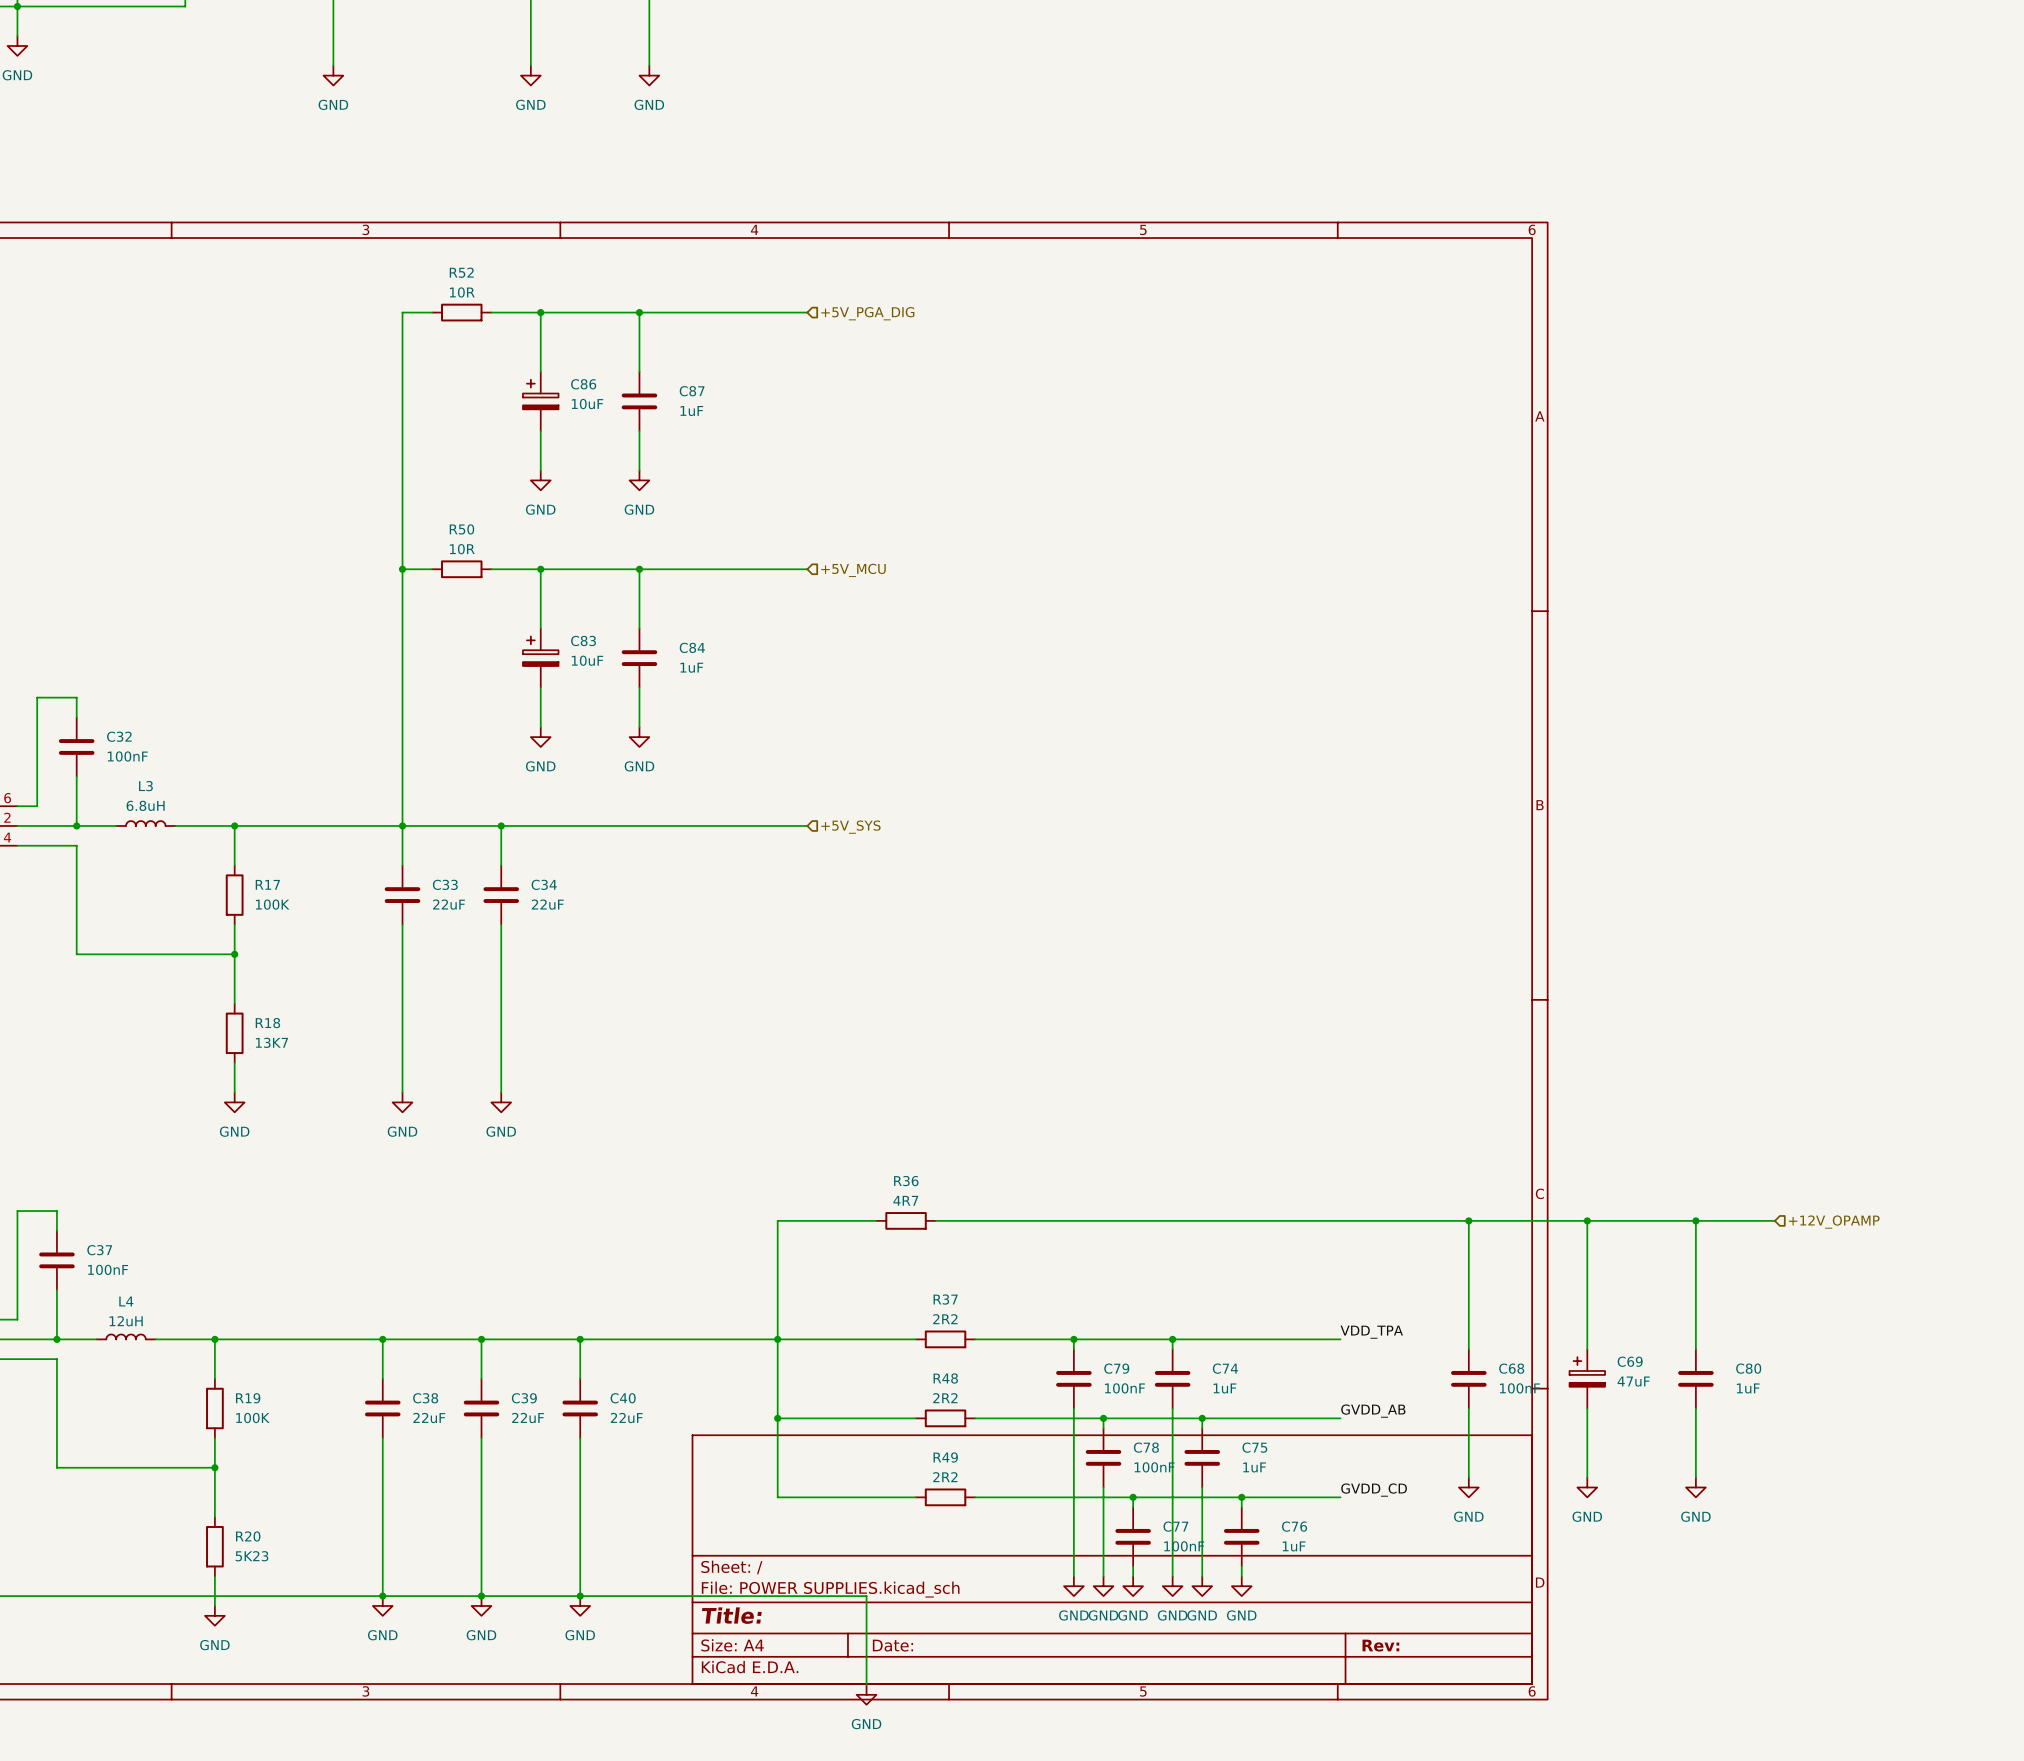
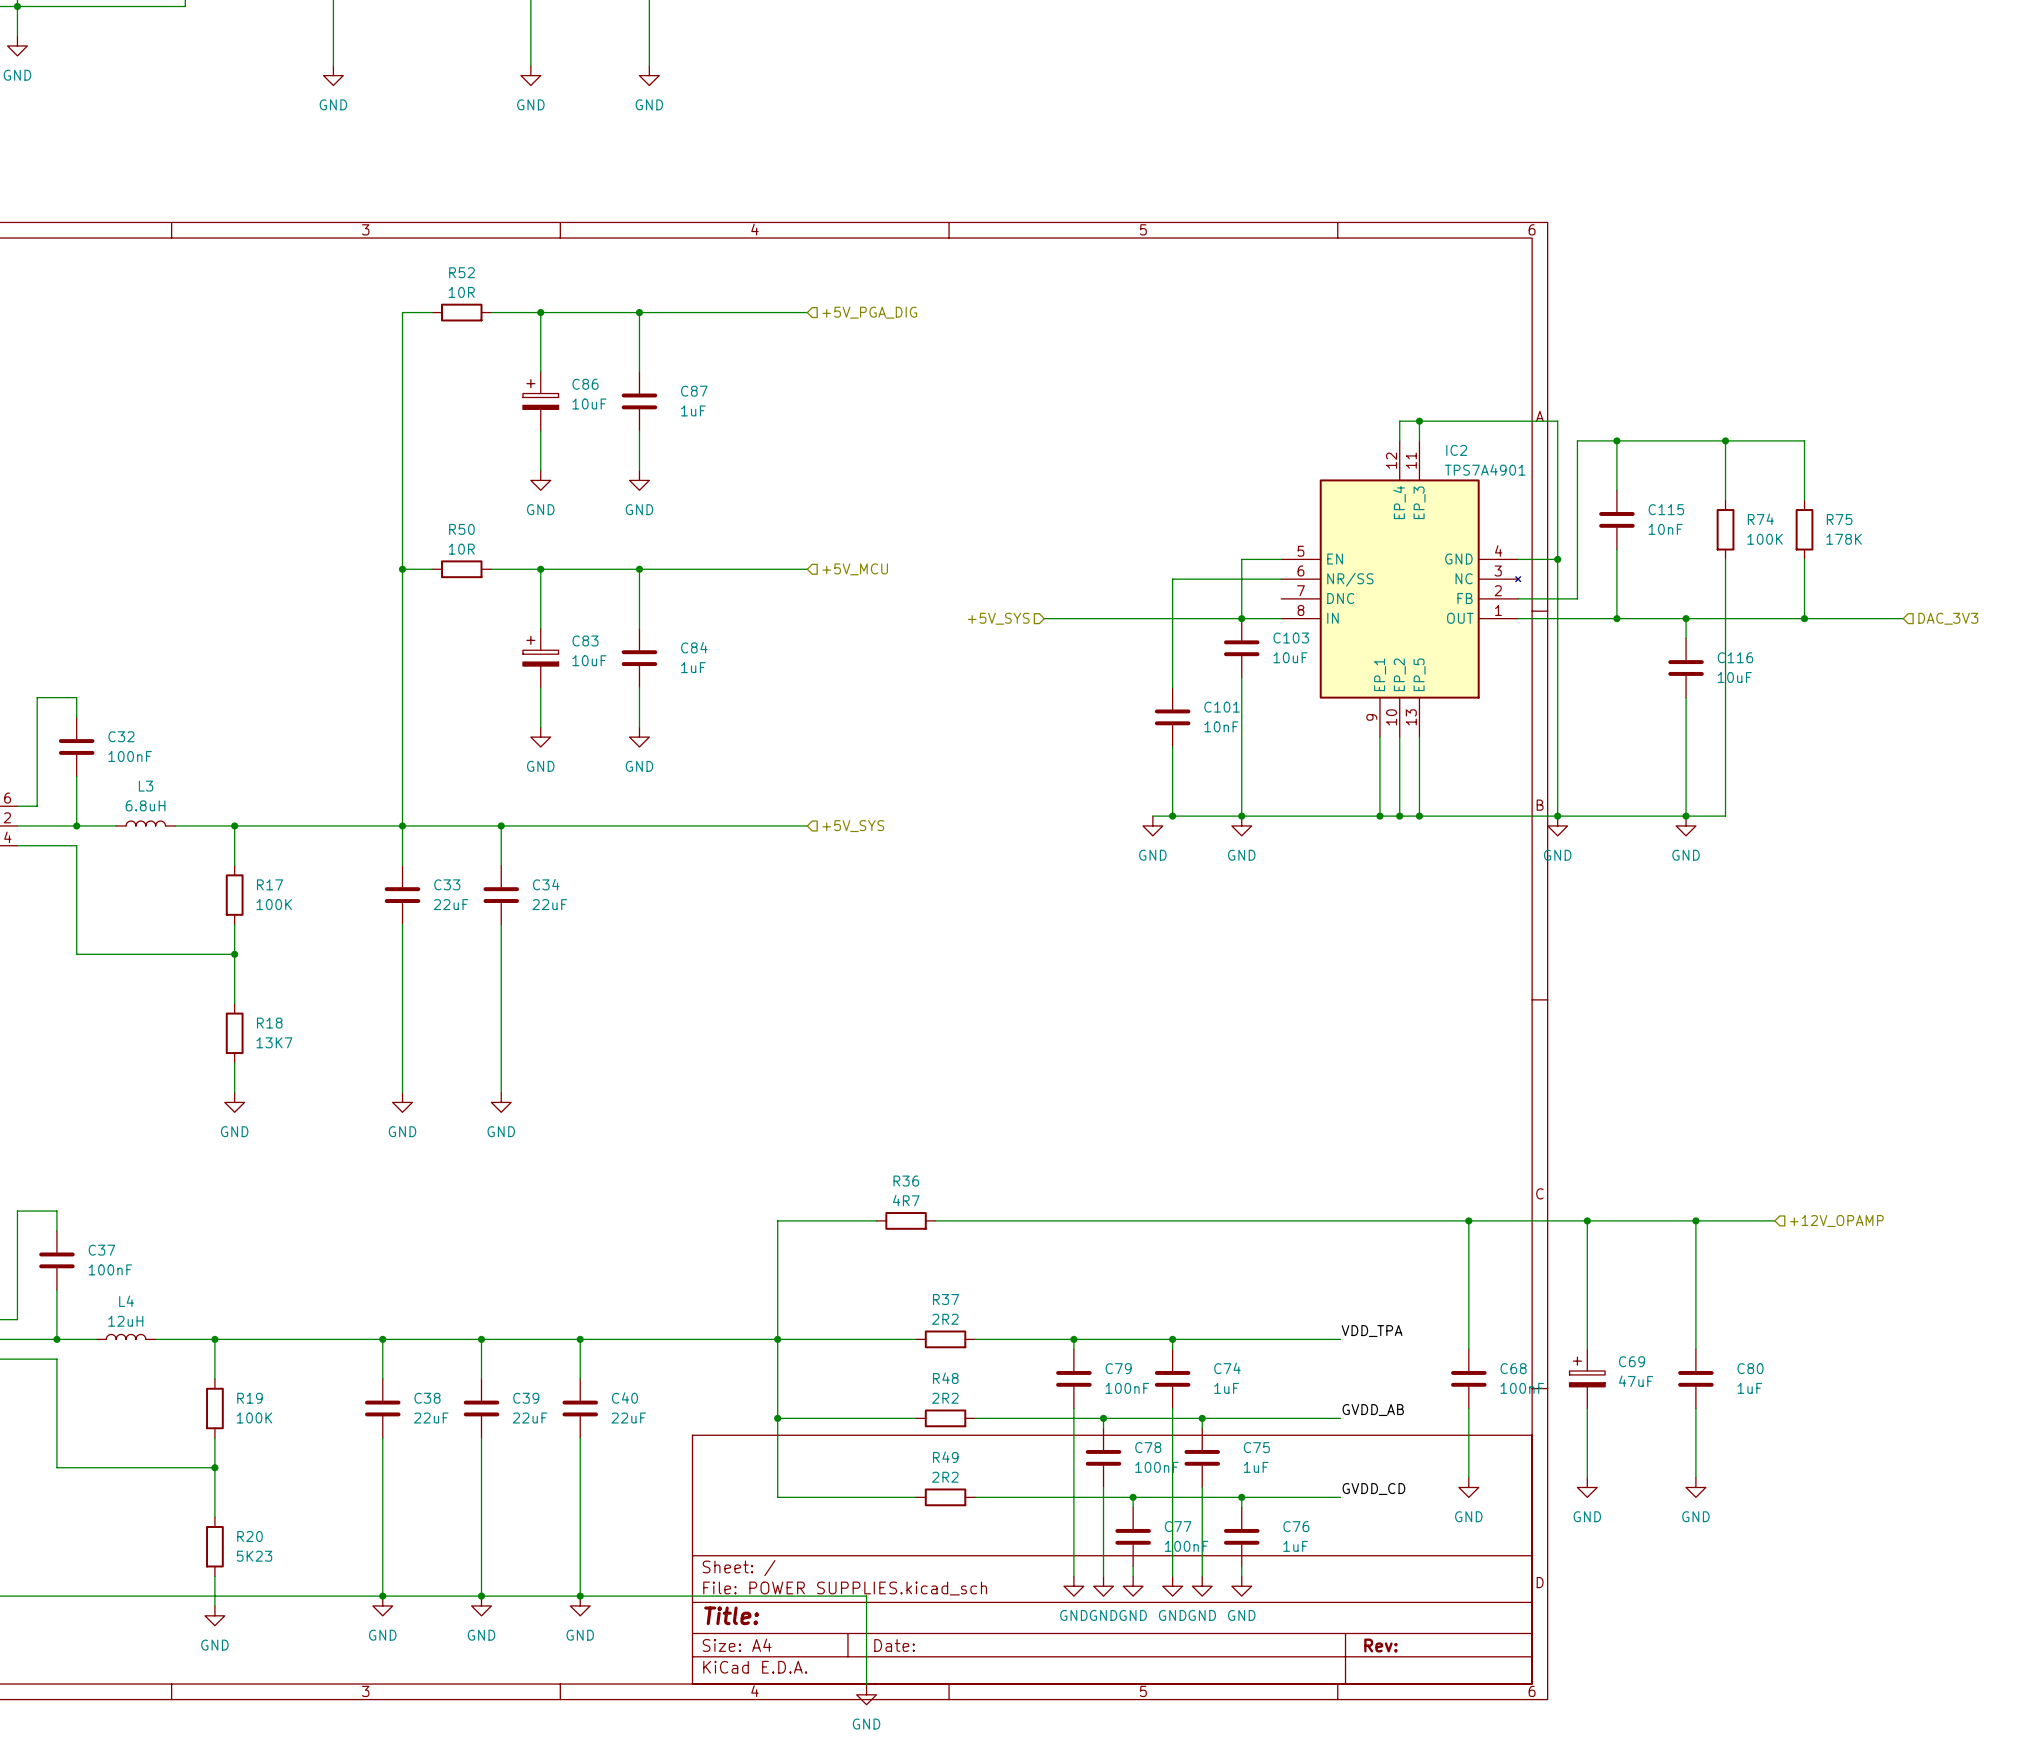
wire: none -> (1419, 421) (1419, 440)
junction: none -> (1419, 421)
wire: none -> (1399, 440) (1399, 421) (1557, 421) (1557, 816)
wire: none -> (1616, 440) (1616, 490)
junction: none -> (1616, 440)
wire: none -> (1725, 440) (1725, 500)
junction: none -> (1725, 440)
wire: none -> (1804, 500) (1804, 440) (1577, 440) (1577, 598) (1518, 598)
C115: none -> 10nF (1616, 519)
R74: none -> 100K (1725, 529)
R75: none -> 178K (1804, 529)
wire: none -> (1616, 549) (1616, 618)
wire: none -> (1281, 559) (1241, 559) (1241, 618)
wire: none -> (1518, 559) (1557, 559)
junction: none -> (1557, 559)
wire: none -> (1725, 559) (1725, 816) (1152, 816)
wire: none -> (1804, 559) (1804, 618)
wire: none -> (1281, 579) (1172, 579) (1172, 687)
IC2: none -> TPS7A4901 (1400, 589)
wire: none -> (1044, 618) (1281, 618)
junction: none -> (1241, 618)
wire: none -> (1518, 618) (1903, 618)
junction: none -> (1616, 618)
wire: none -> (1686, 618) (1686, 638)
junction: none -> (1686, 618)
junction: none -> (1804, 618)
hierarchical label: none -> +5V_SYS (998, 618)
hierarchical label: none -> DAC_3V3 (1948, 618)
C103: none -> 10uF (1241, 648)
C116: none -> 10uF (1686, 668)
wire: none -> (1241, 677) (1241, 816)
wire: none -> (1686, 697) (1686, 816)
C101: none -> 10nF (1172, 717)
wire: none -> (1379, 737) (1379, 816)
wire: none -> (1399, 737) (1399, 816)
wire: none -> (1419, 737) (1419, 816)
wire: none -> (1172, 746) (1172, 816)
junction: none -> (1172, 816)
junction: none -> (1241, 816)
junction: none -> (1379, 816)
junction: none -> (1399, 816)
junction: none -> (1419, 816)
junction: none -> (1557, 816)
junction: none -> (1686, 816)
power symbol: none -> GND (1152, 825)
power symbol: none -> GND (1241, 825)
power symbol: none -> GND (1557, 825)
power symbol: none -> GND (1686, 825)

